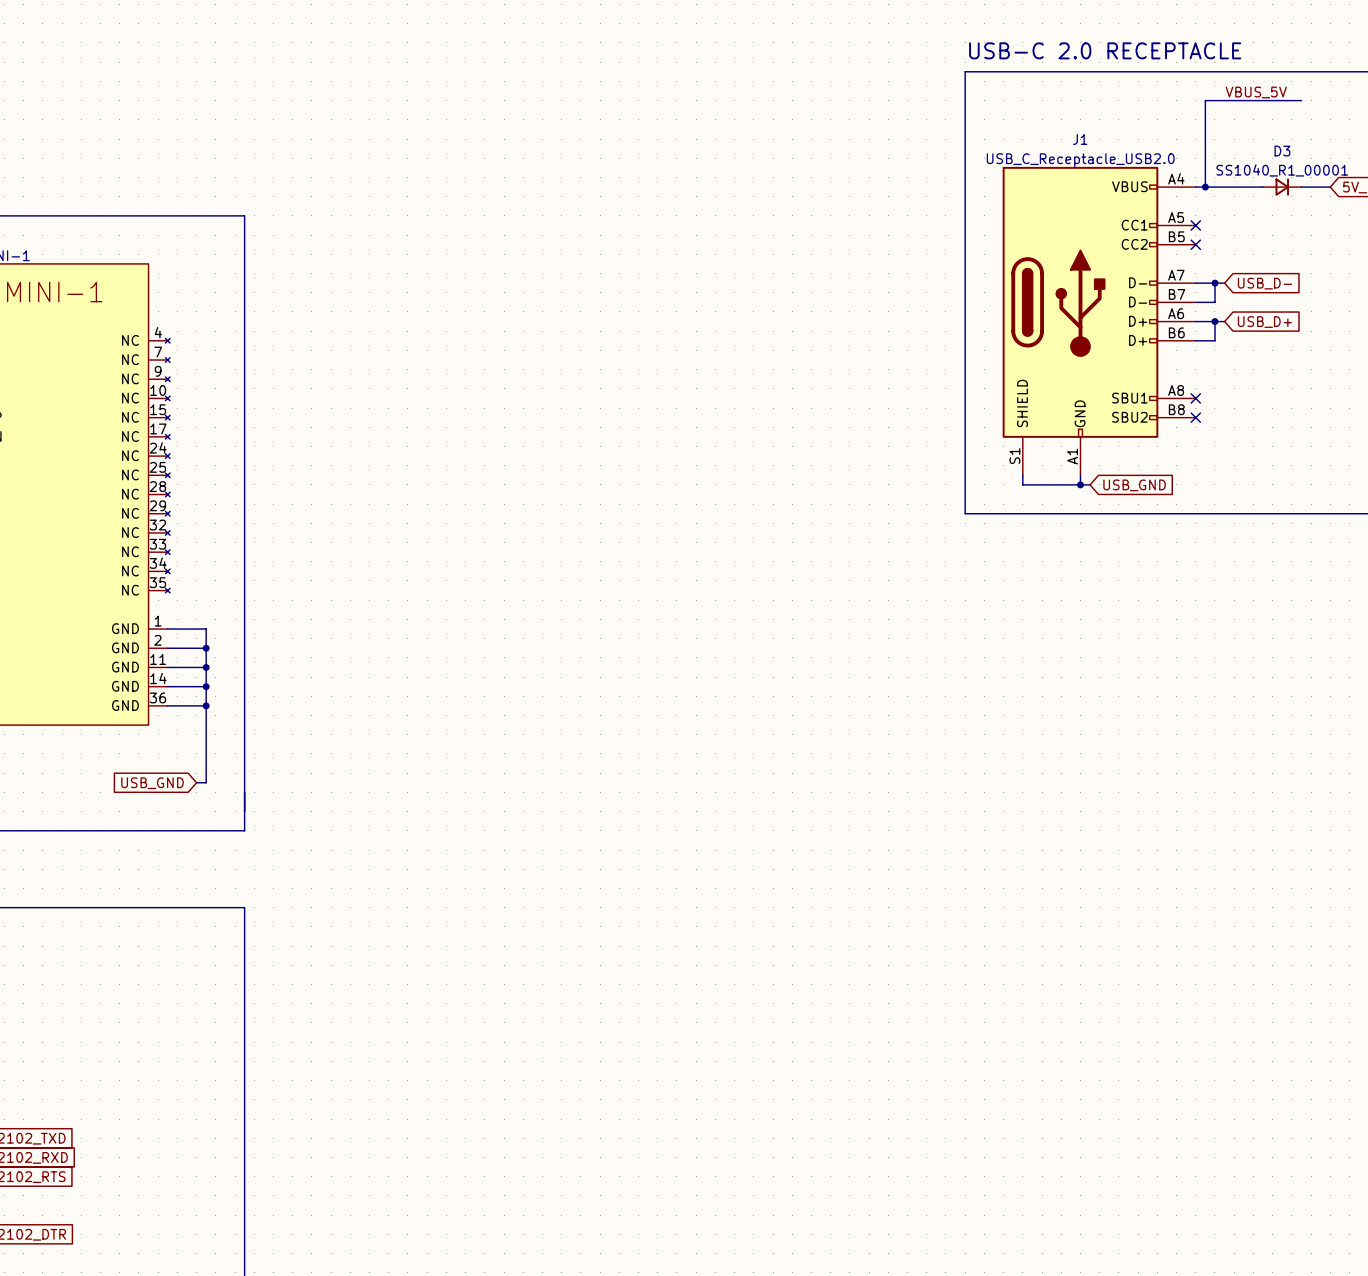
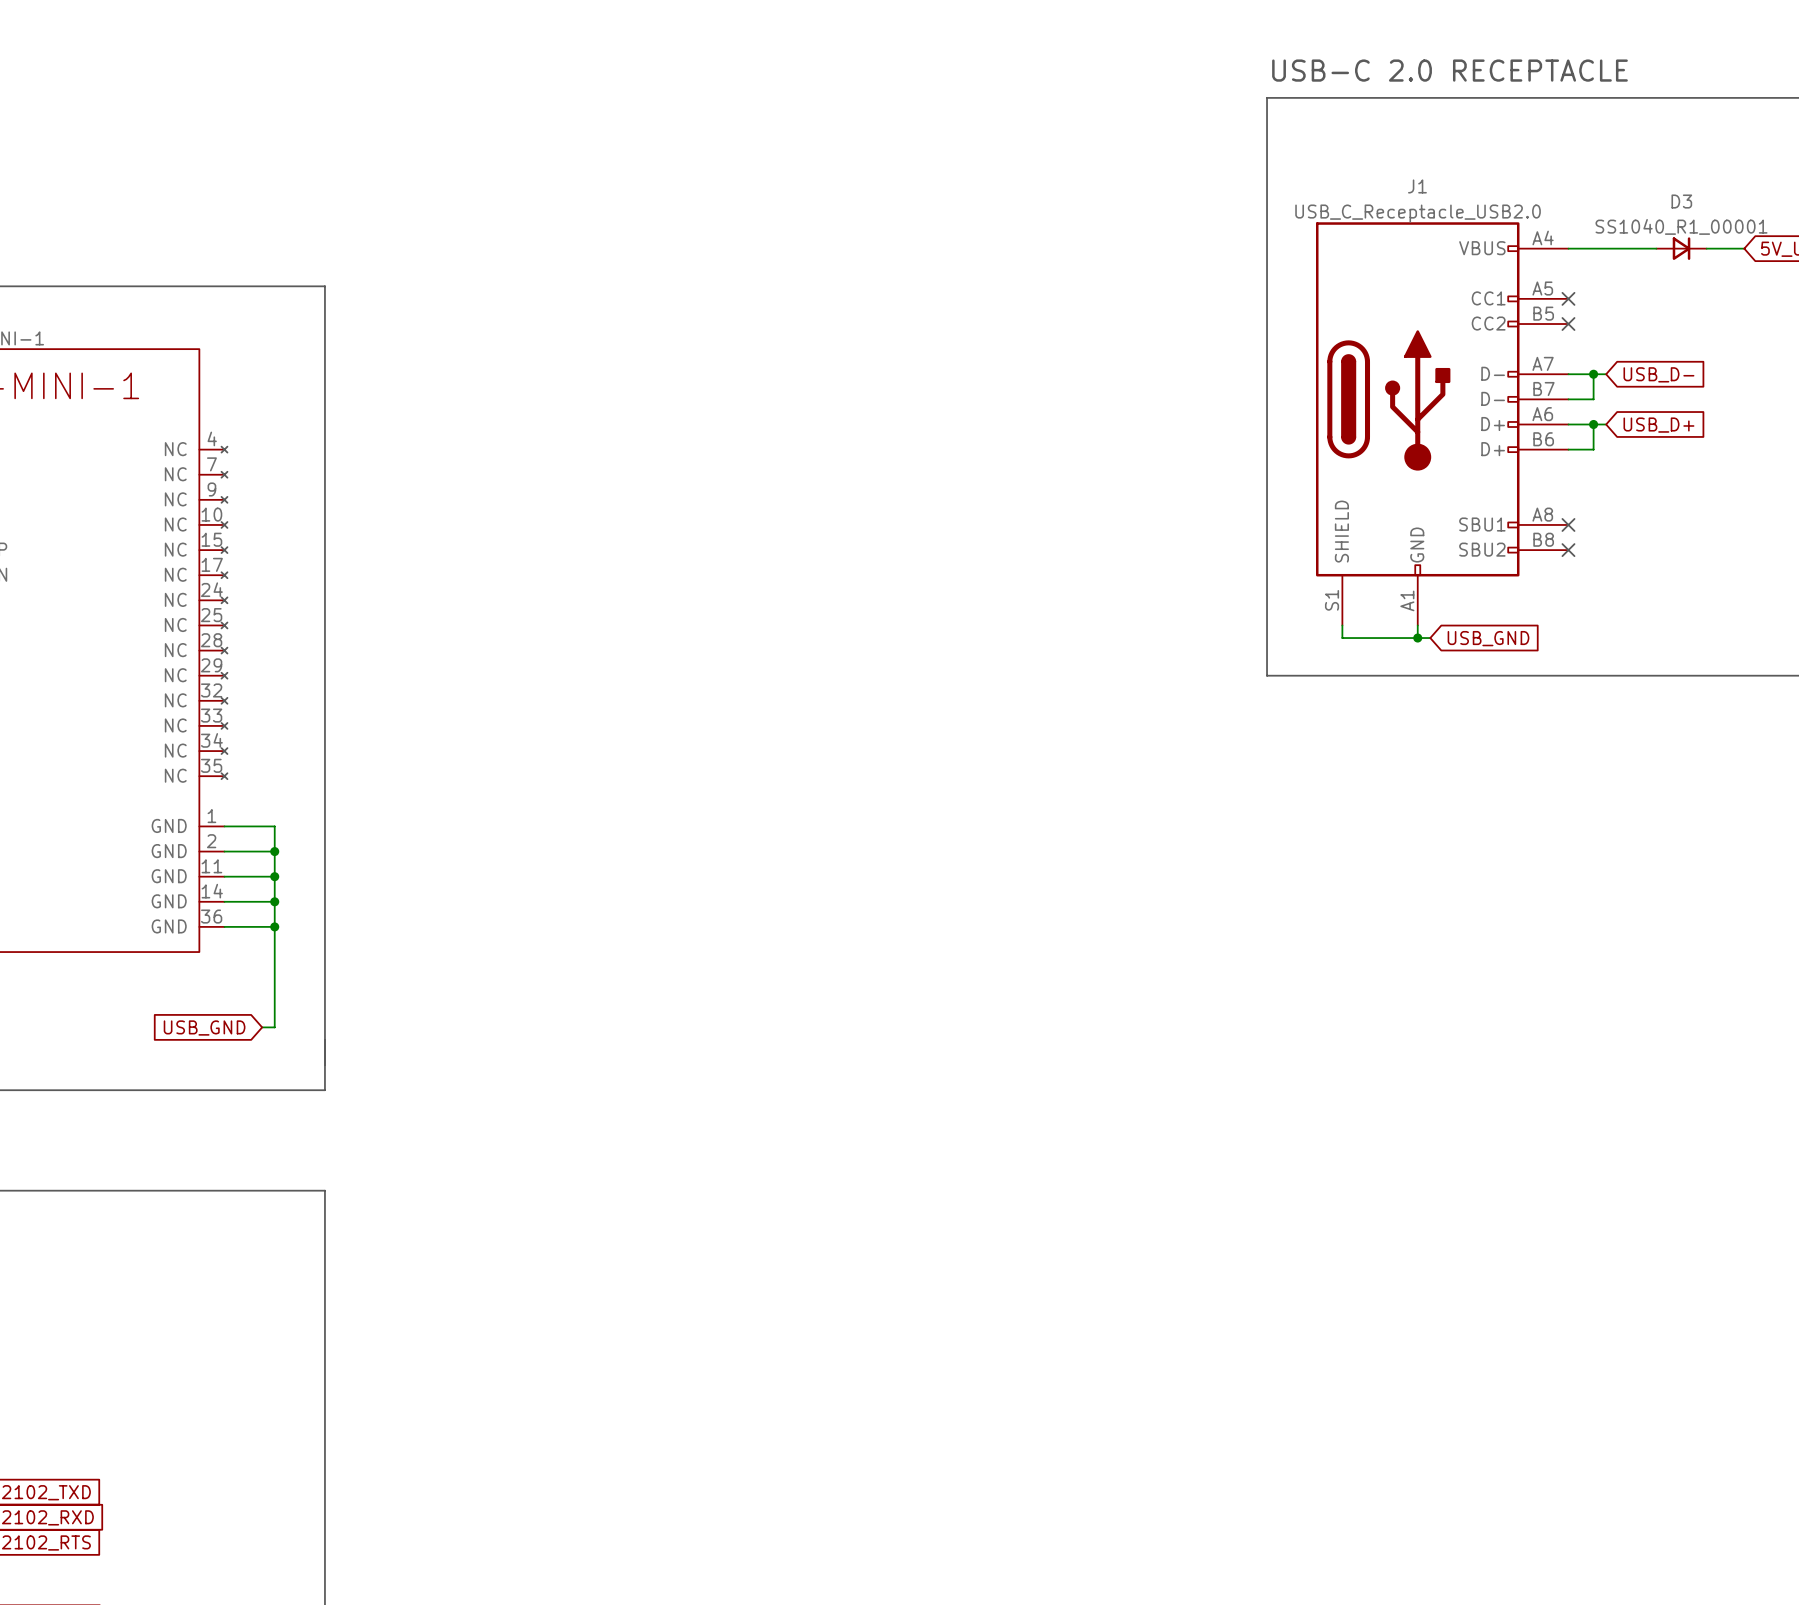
label: VBUS_5V (1256, 92) -> none
wire: (1301, 100) (1205, 100) (1205, 187) -> none
junction: (1205, 187) -> none

